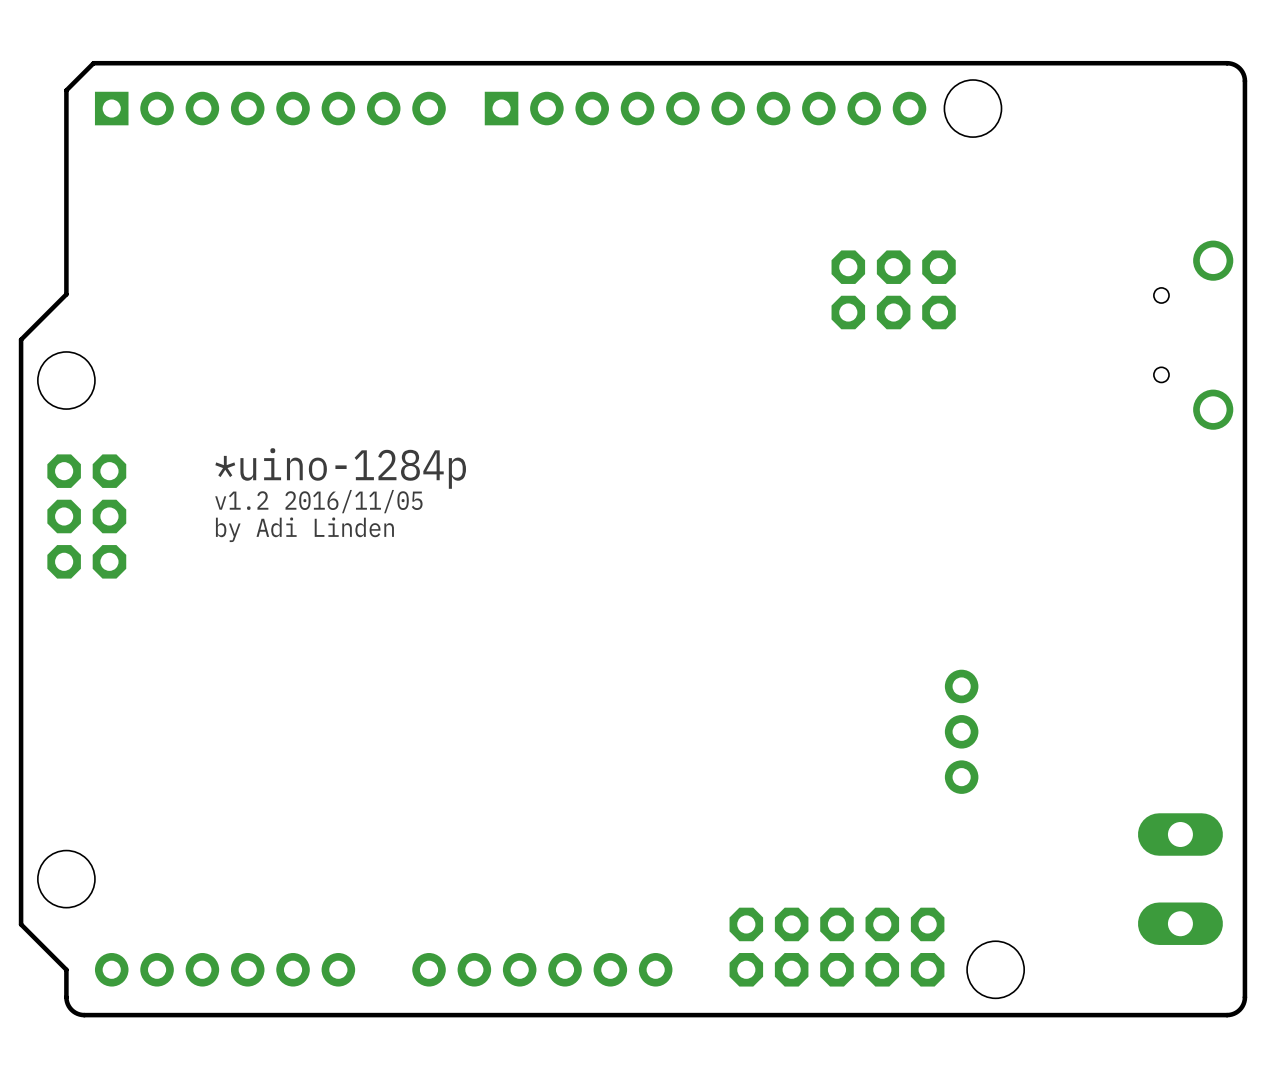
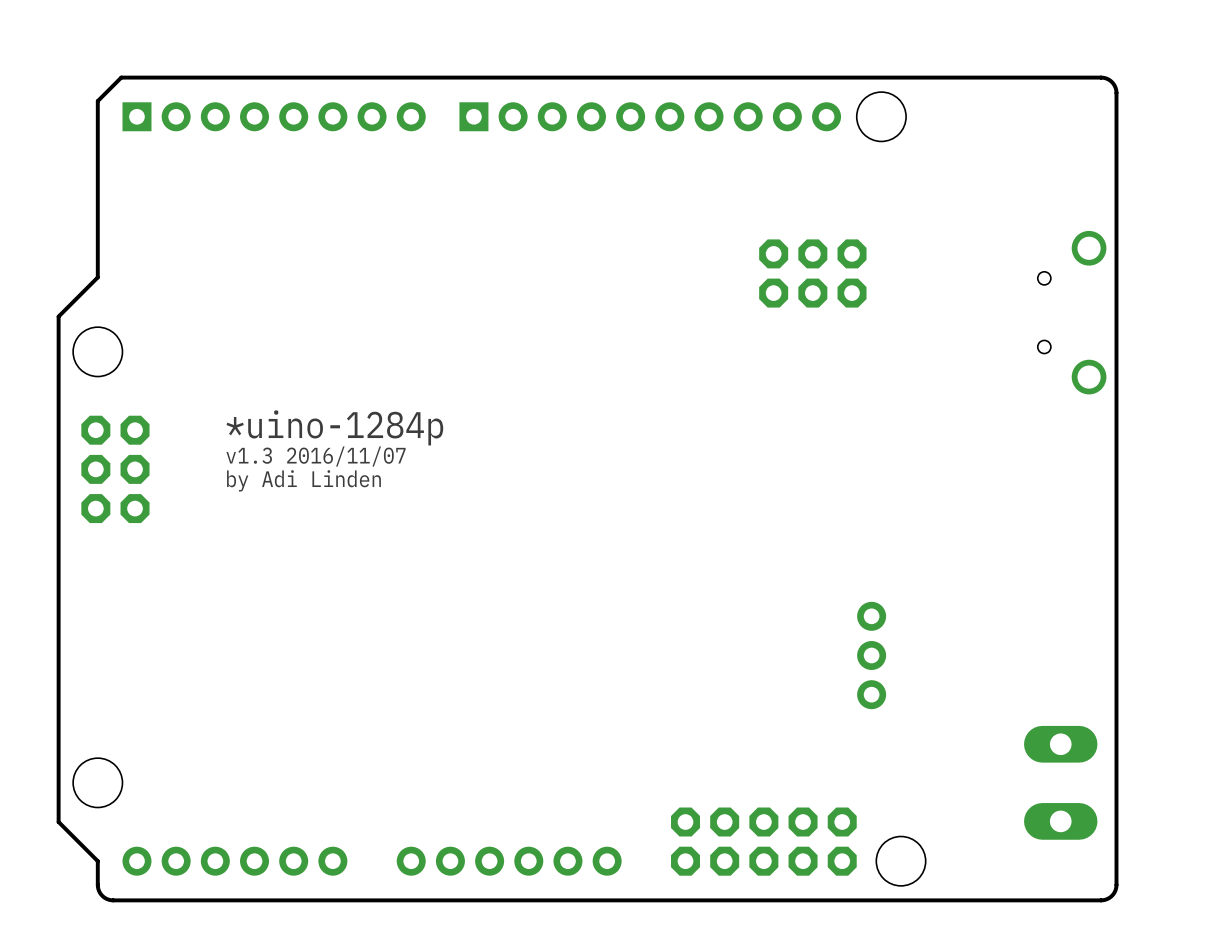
text: v1.2 2016/11/05 (318, 501) -> v1.3 2016/11/07 (316, 456)

